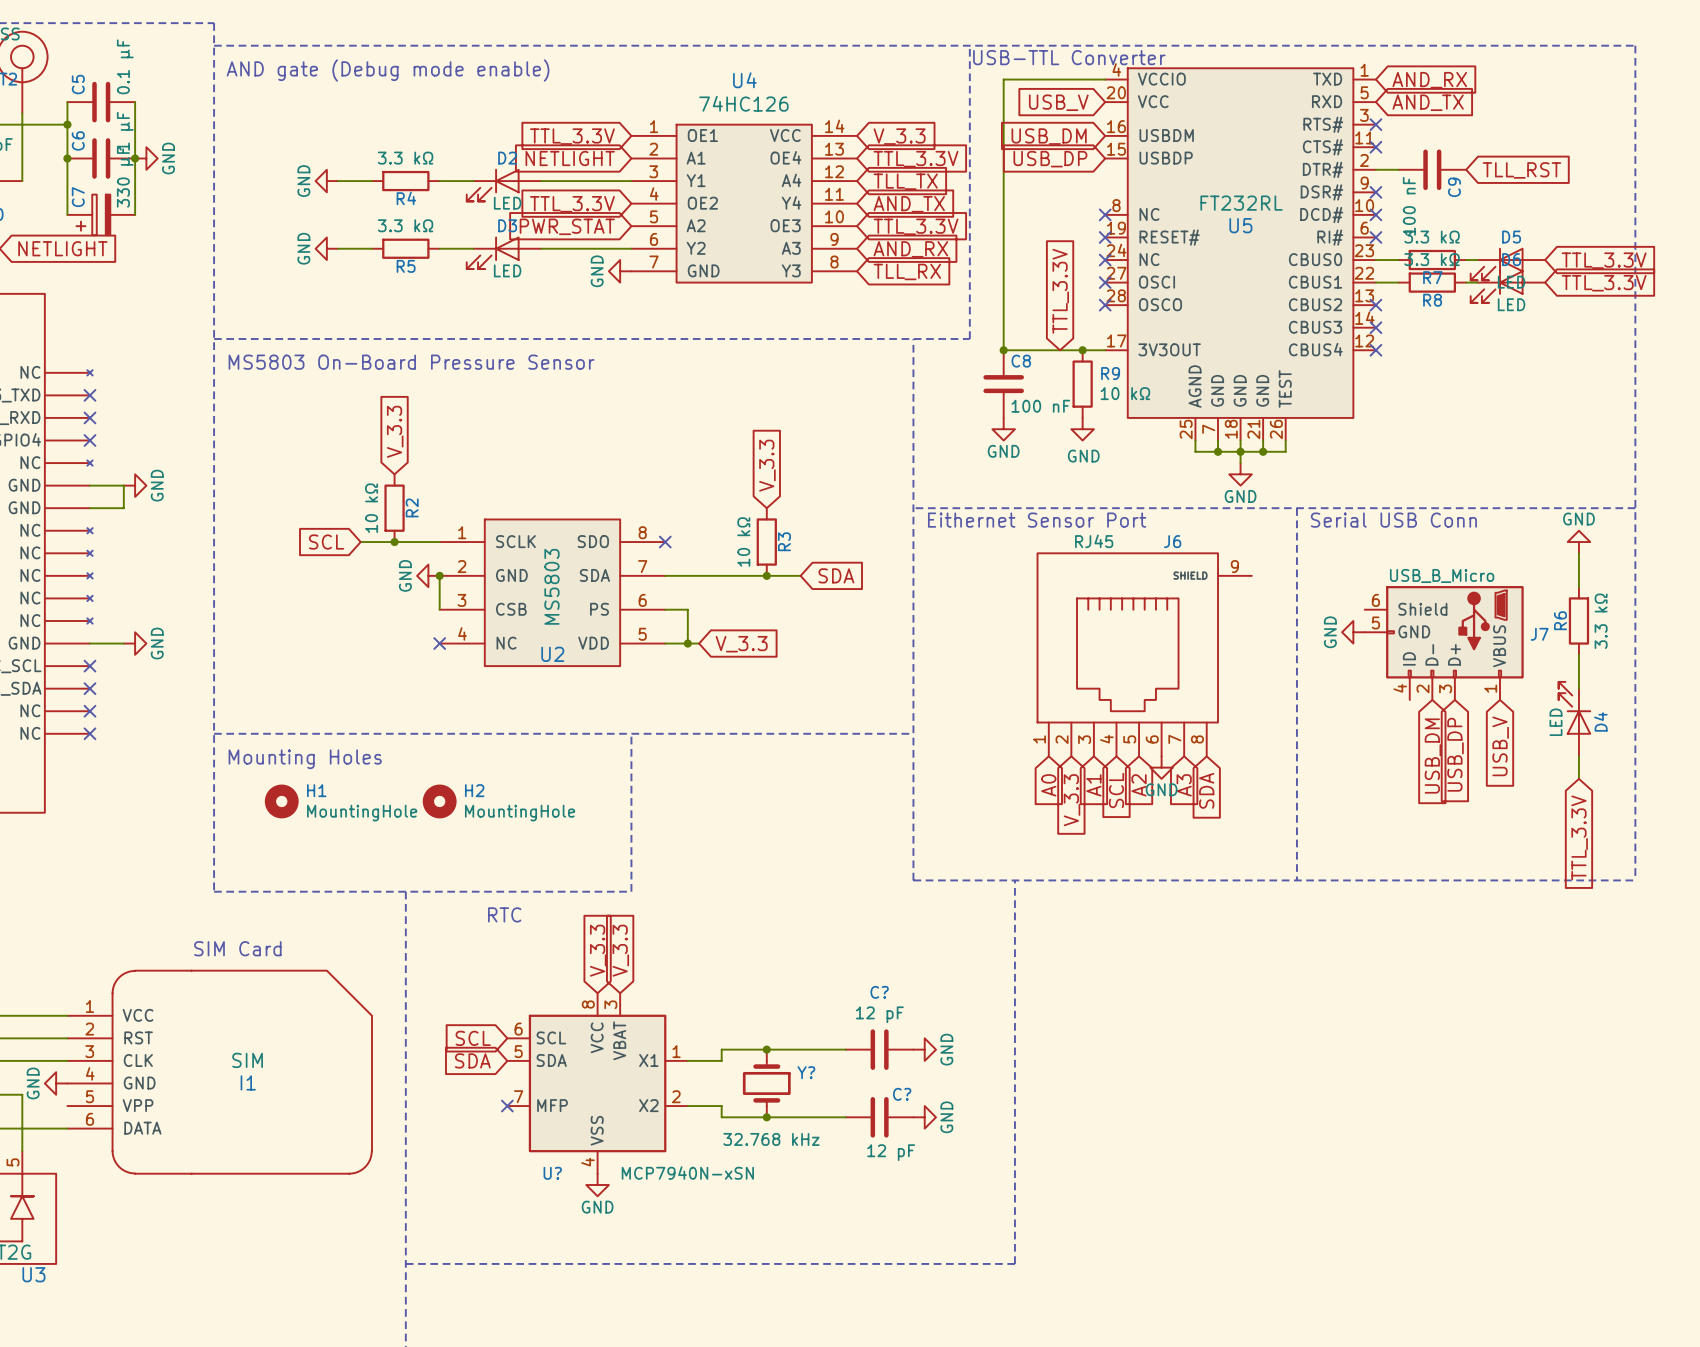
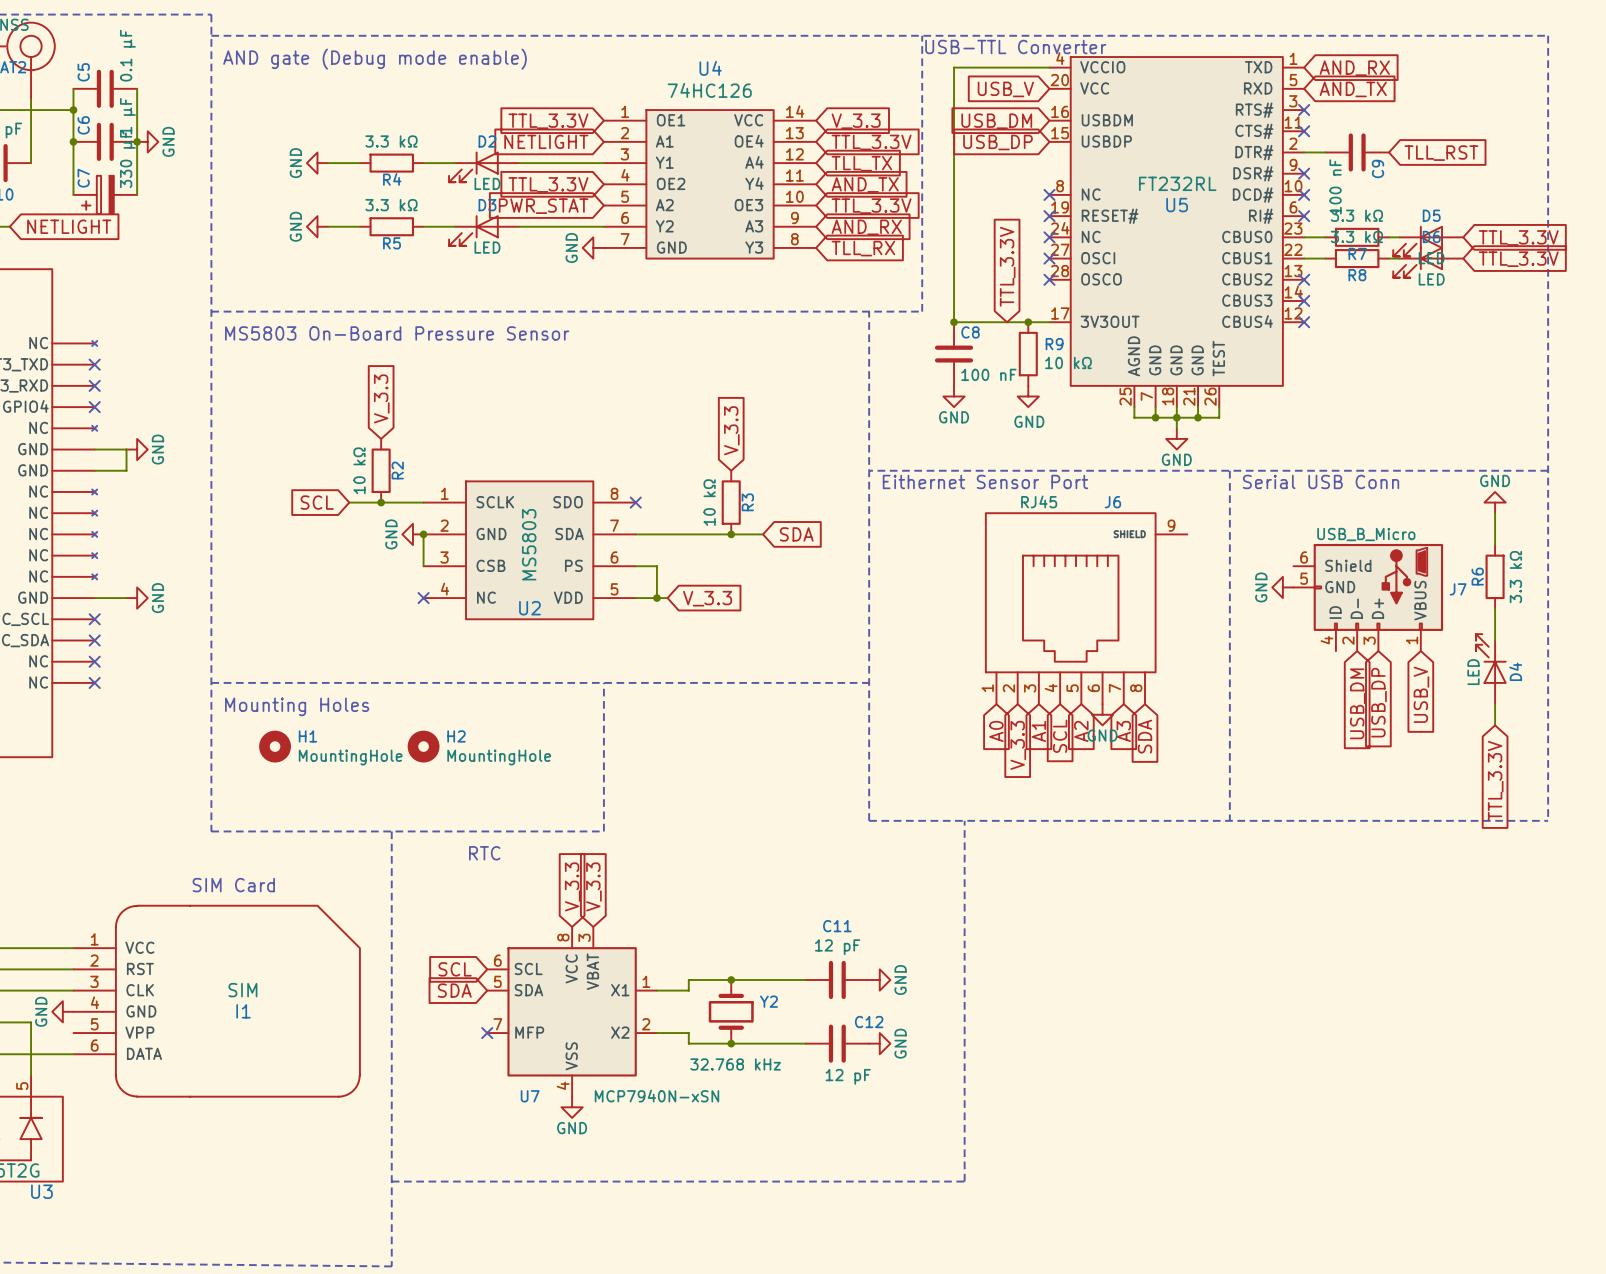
C? name: C? (879, 992) -> C11 (837, 926)
Y? name: Y? (806, 1072) -> Y2 (768, 1001)
C? name: C? (902, 1094) -> C12 (869, 1022)
U? name: U? (552, 1173) -> U7 (530, 1096)

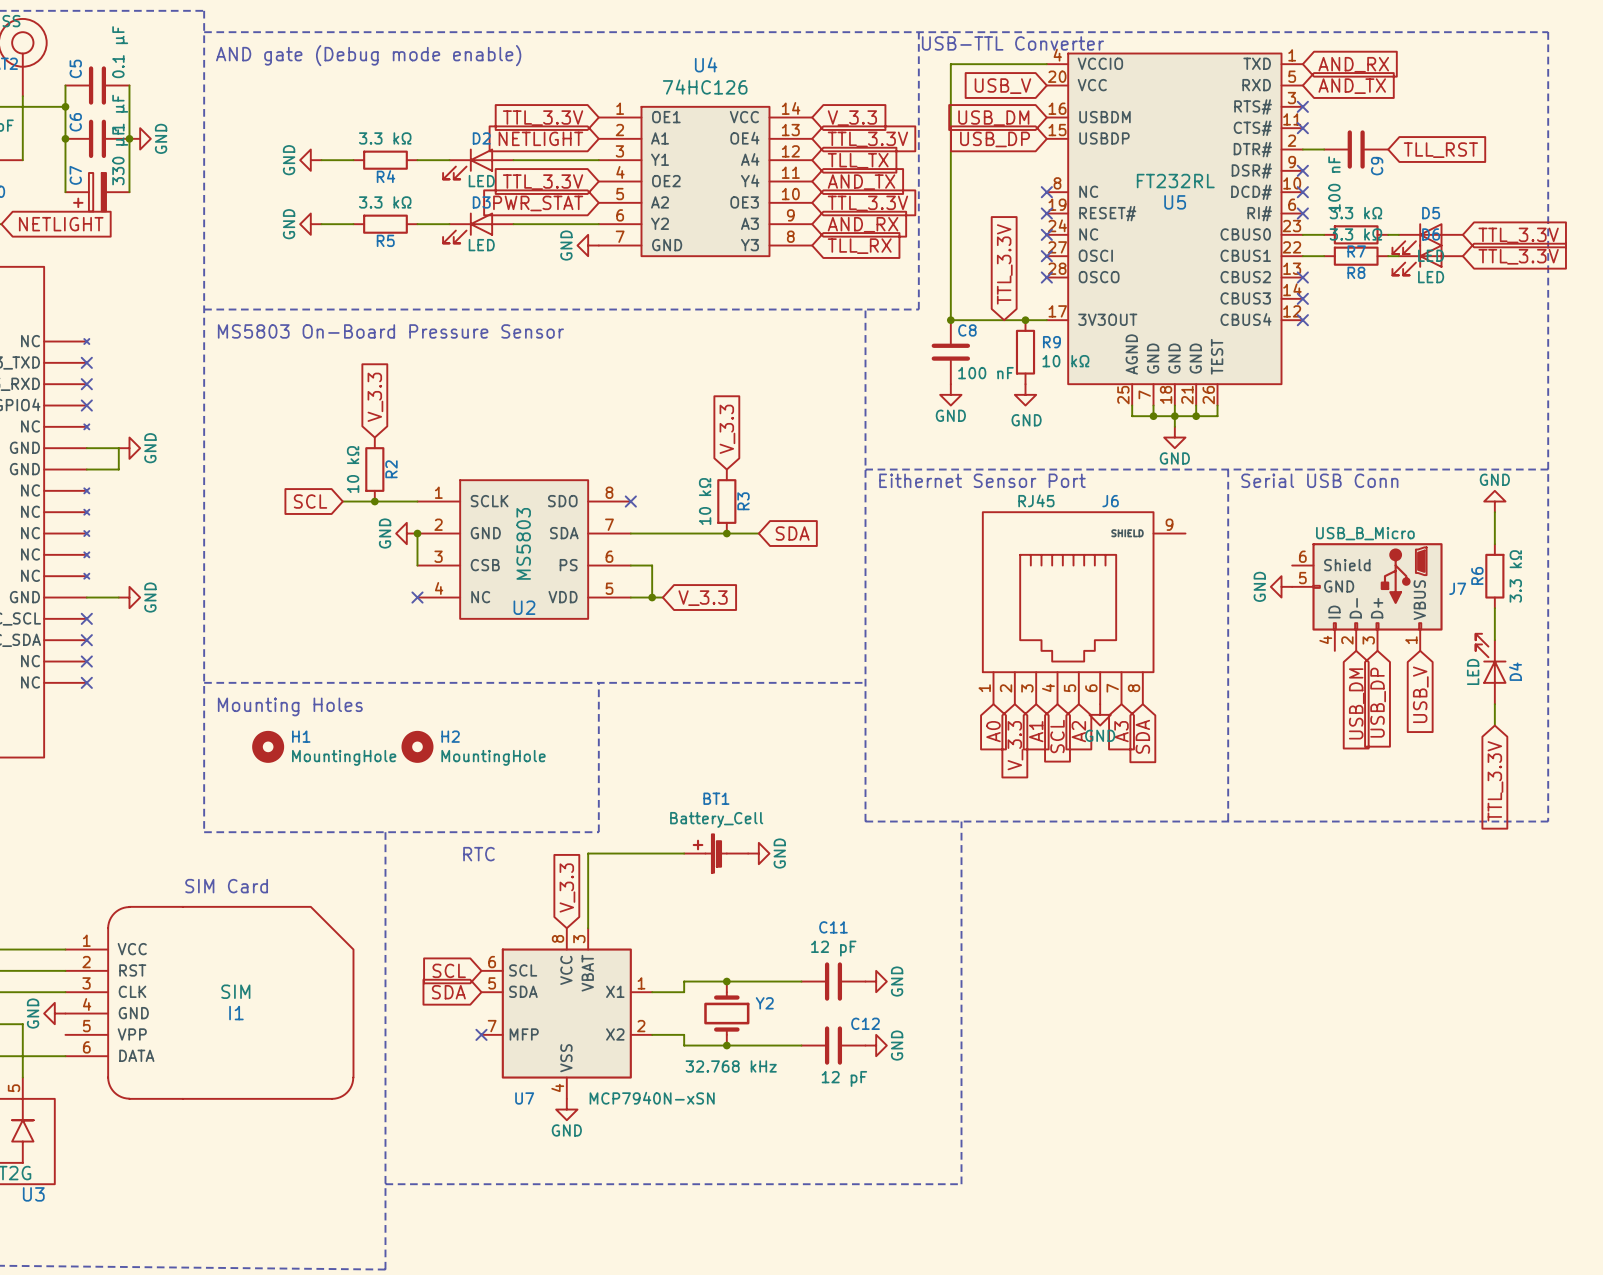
wire: none -> (684, 853) (588, 853) (588, 928)
BT1: none -> Battery_Cell (716, 853)
power symbol: none -> GND (758, 853)
global label: V_3.3 (593, 886) -> none

